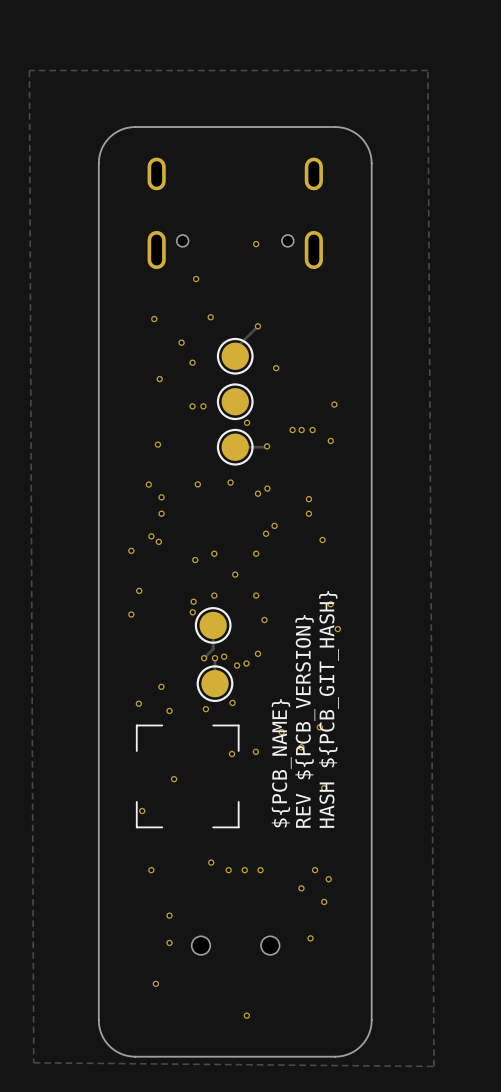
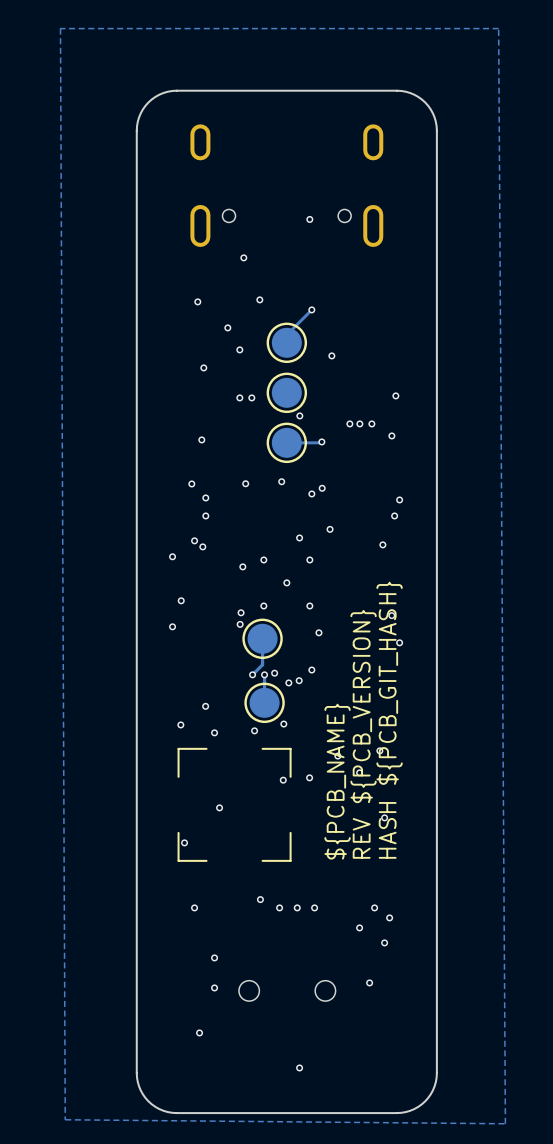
via: (308, 499) -> none
via: none -> (399, 499)
via: (308, 513) -> none
via: none -> (394, 515)
via position: (266, 533) -> (299, 537)

